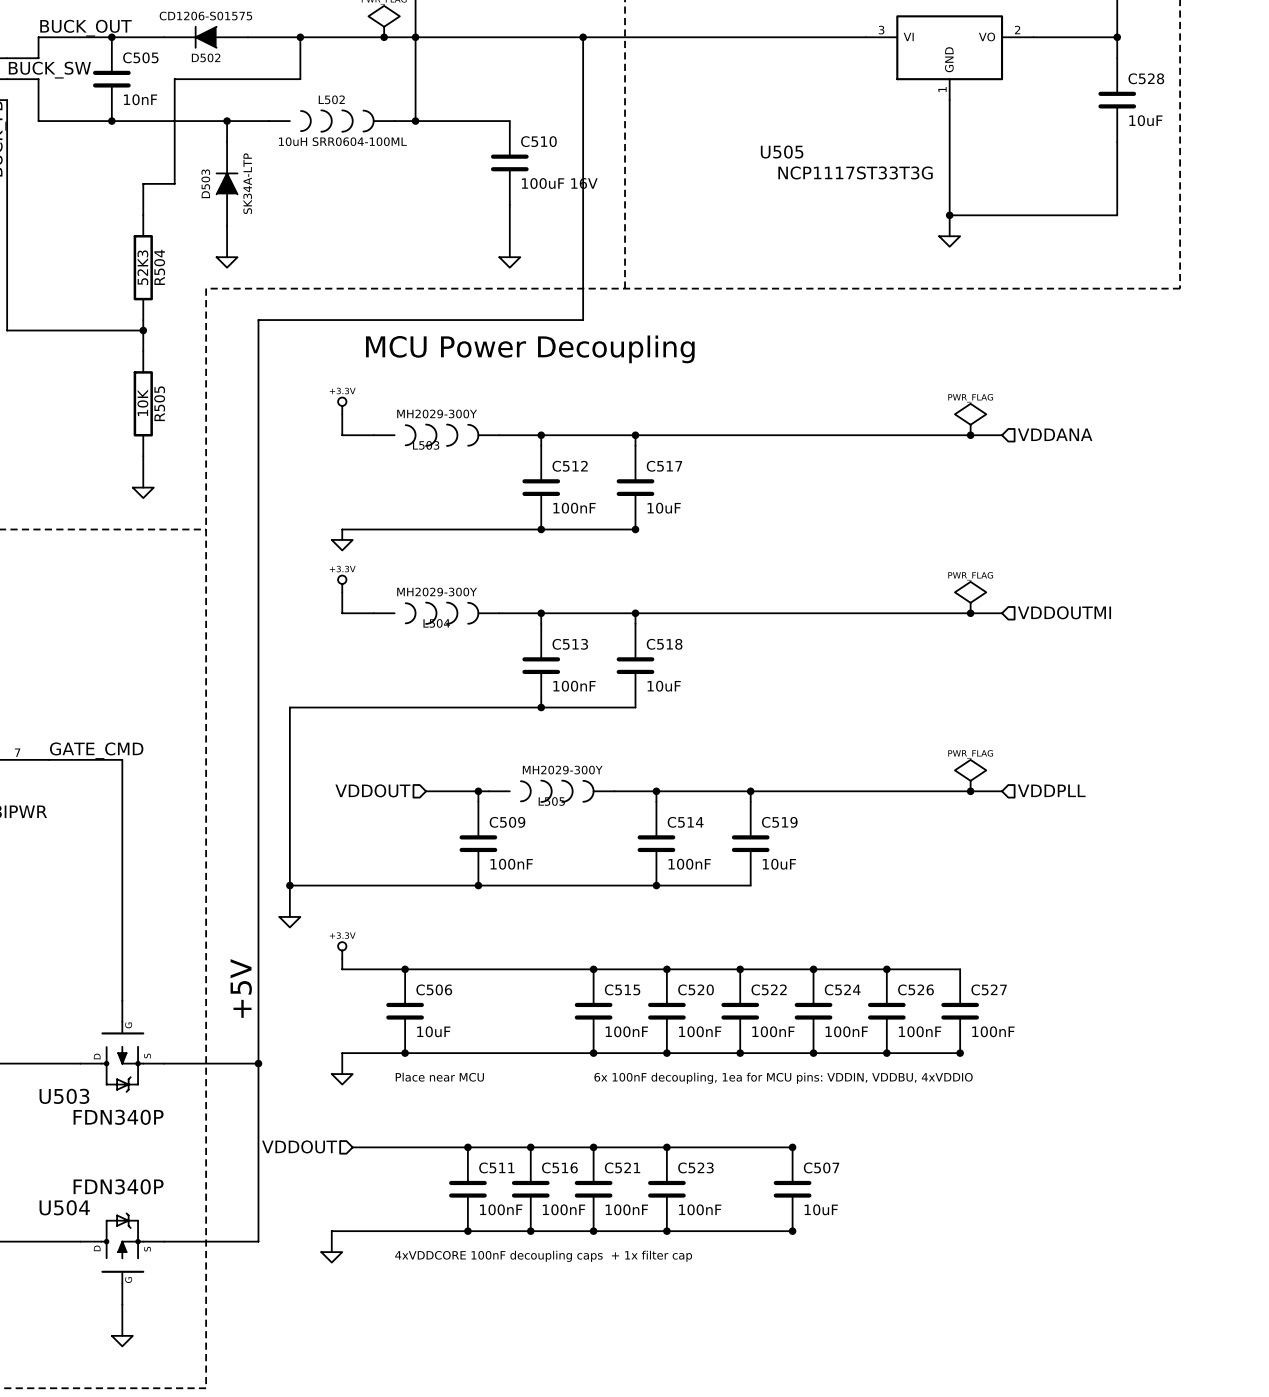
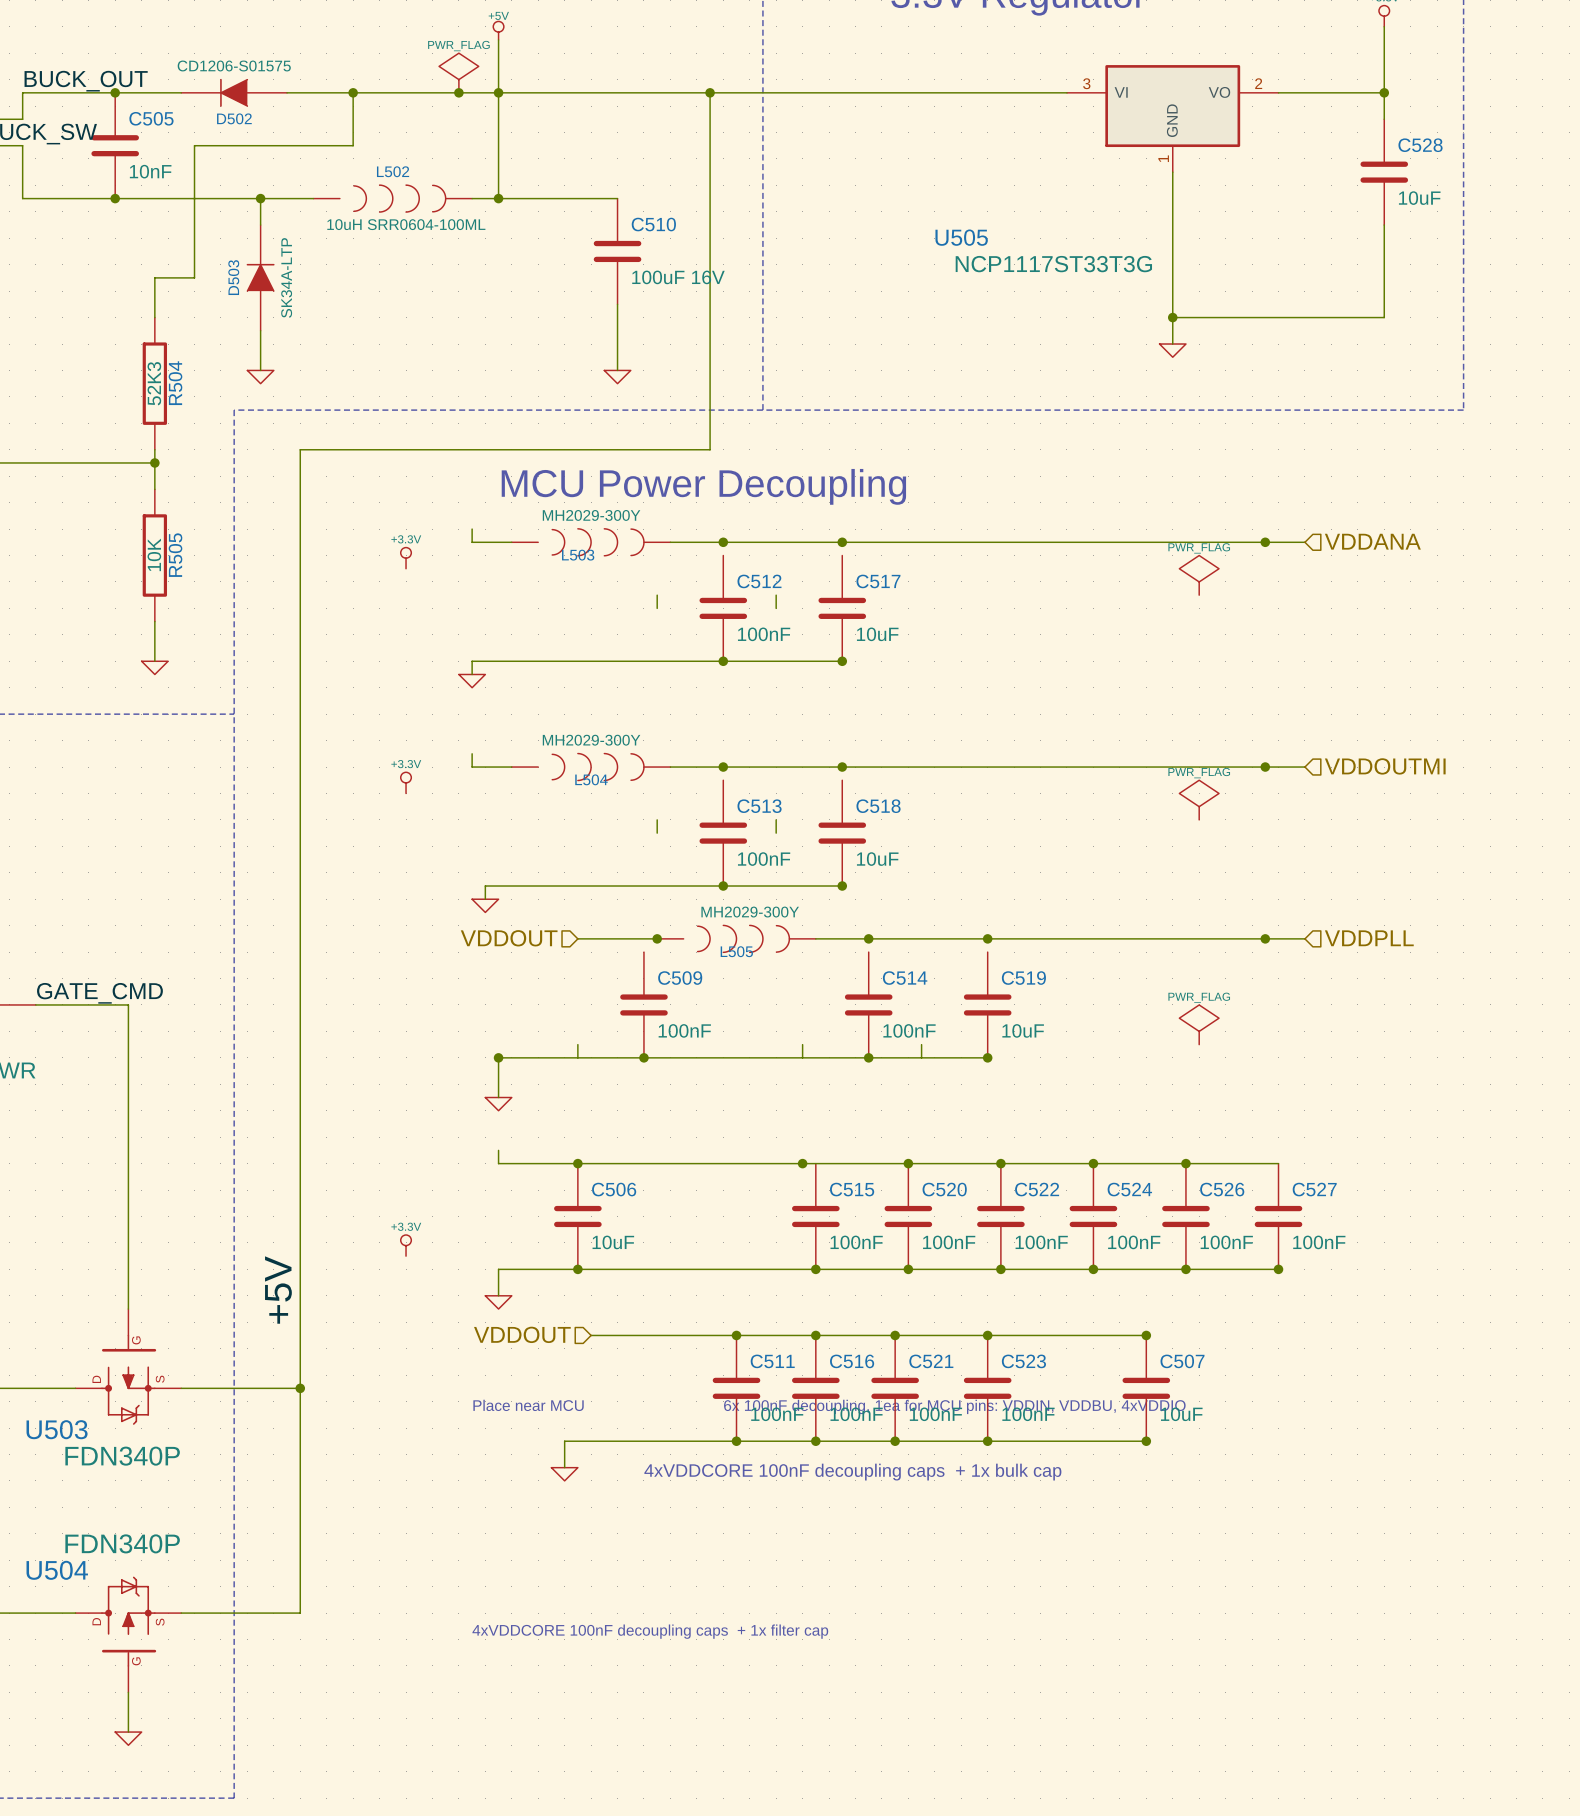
text position: MCU Power Decoupling (530, 349) -> MCU Power Decoupling (703, 486)
wire: none -> (472, 529) (472, 542) (511, 542)
junction: none -> (723, 542)
junction: none -> (842, 542)
junction: none -> (1265, 542)
wire: (342, 414) (342, 435) (373, 435) -> none
hierarchical label position: VDDANA (1055, 434) -> VDDANA (1372, 541)
L503 position: (436, 435) -> (591, 542)
wire: (499, 435) (1002, 435) -> (670, 542) (1304, 542)
junction: (541, 435) -> none
junction: (635, 435) -> none
junction: (970, 435) -> none
C512 position: (541, 487) -> (723, 608)
junction: none -> (723, 661)
C517 position: (635, 487) -> (842, 608)
junction: none -> (842, 661)
junction: (541, 529) -> none
wire: (635, 529) (342, 529) (342, 539) -> (842, 661) (472, 661) (472, 674)
junction: (635, 529) -> none
power symbol position: (342, 545) -> (472, 681)
wire: none -> (472, 753) (472, 767) (511, 767)
junction: none -> (723, 767)
junction: none -> (842, 767)
junction: none -> (1265, 767)
wire: (342, 592) (342, 613) (373, 613) -> none
hierarchical label position: VDDOUTMI (1064, 612) -> VDDOUTMI (1385, 766)
L504 position: (436, 613) -> (591, 767)
wire: (499, 613) (1002, 613) -> (670, 767) (1304, 767)
junction: (541, 613) -> none
junction: (635, 613) -> none
junction: (970, 613) -> none
C513 position: (541, 665) -> (723, 833)
junction: none -> (723, 886)
C518 position: (635, 665) -> (842, 833)
wire: none -> (842, 886) (485, 886) (485, 899)
junction: none -> (842, 886)
power symbol: none -> (485, 905)
wire: (478, 707) (289, 707) (289, 916) -> none
wire: (541, 707) (635, 707) -> none
junction: none -> (868, 938)
junction: none -> (987, 938)
junction: none -> (1265, 938)
hierarchical label position: VDDOUT (372, 790) -> VDDOUT (509, 938)
hierarchical label position: VDDPLL (1051, 790) -> VDDPLL (1369, 938)
wire: (426, 791) (488, 791) -> none
junction: (478, 791) -> none
L505 position: (551, 791) -> (736, 938)
wire: (614, 791) (1002, 791) -> (815, 938) (1304, 938)
junction: (656, 791) -> none
junction: (750, 791) -> none
junction: (970, 791) -> none
junction: none -> (498, 1057)
junction: none -> (643, 1057)
junction: none -> (868, 1057)
wire: none -> (987, 1057) (498, 1057) (498, 1097)
junction: none -> (987, 1057)
power symbol: none -> (498, 1104)
C509 position: (478, 843) -> (643, 1004)
C514 position: (656, 843) -> (868, 1004)
C519 position: (750, 843) -> (987, 1004)
wire: (289, 885) (415, 885) -> (498, 1150) (498, 1163)
junction: (289, 885) -> none
junction: none -> (908, 1163)
wire: none -> (921, 1163) (1278, 1163)
junction: none -> (1000, 1163)
junction: none -> (1093, 1163)
junction: none -> (1185, 1163)
power symbol: (289, 922) -> none
wire: (342, 958) (342, 969) (415, 969) -> (498, 1295) (498, 1269)
junction: (405, 969) -> none
junction: none -> (577, 1269)
junction: (593, 969) -> none
wire: none -> (1185, 1269) (1278, 1269)
junction: none -> (1185, 1269)
junction: none -> (1278, 1269)
power symbol: none -> (498, 1302)
C506 position: (405, 1011) -> (577, 1216)
C515 position: (593, 1011) -> (815, 1216)
C520 position: (666, 1011) -> (908, 1216)
C522 position: (740, 1011) -> (1000, 1216)
C524 position: (813, 1011) -> (1093, 1216)
C526 position: (886, 1011) -> (1185, 1216)
C527 position: (960, 1011) -> (1278, 1216)
hierarchical label: none -> VDDOUT (522, 1334)
junction: none -> (736, 1335)
junction: none -> (815, 1335)
junction: none -> (895, 1335)
junction: none -> (987, 1335)
junction: none -> (1146, 1335)
junction: (405, 1053) -> none
junction: (593, 1053) -> none
junction: (666, 1053) -> none
junction: (740, 1053) -> none
junction: (813, 1053) -> none
junction: (886, 1053) -> none
wire: (960, 1053) (342, 1053) (342, 1074) -> none
junction: (960, 1053) -> none
power symbol: (342, 1079) -> none
junction: none -> (736, 1441)
junction: none -> (815, 1441)
junction: none -> (895, 1441)
junction: none -> (987, 1441)
junction: none -> (1146, 1441)
text: none -> 4xVDDCORE 100nF decoupling caps + 1x bulk cap (852, 1472)
power symbol: none -> (564, 1474)
hierarchical label: VDDOUT (299, 1146) -> none
wire: (352, 1147) (792, 1147) -> (591, 1335) (1146, 1335)
junction: (467, 1147) -> none
junction: (530, 1147) -> none
junction: (593, 1147) -> none
junction: (666, 1147) -> none
junction: (792, 1147) -> none
C511 position: (467, 1189) -> (736, 1388)
C516 position: (530, 1189) -> (815, 1388)
C521 position: (593, 1189) -> (895, 1388)
C523 position: (666, 1189) -> (987, 1388)
C507 position: (792, 1189) -> (1146, 1388)
junction: (467, 1231) -> none
junction: (530, 1231) -> none
junction: (593, 1231) -> none
junction: (666, 1231) -> none
wire: (792, 1231) (331, 1231) (331, 1252) -> (1146, 1441) (564, 1441) (564, 1467)
junction: (792, 1231) -> none
power symbol: (331, 1257) -> none

